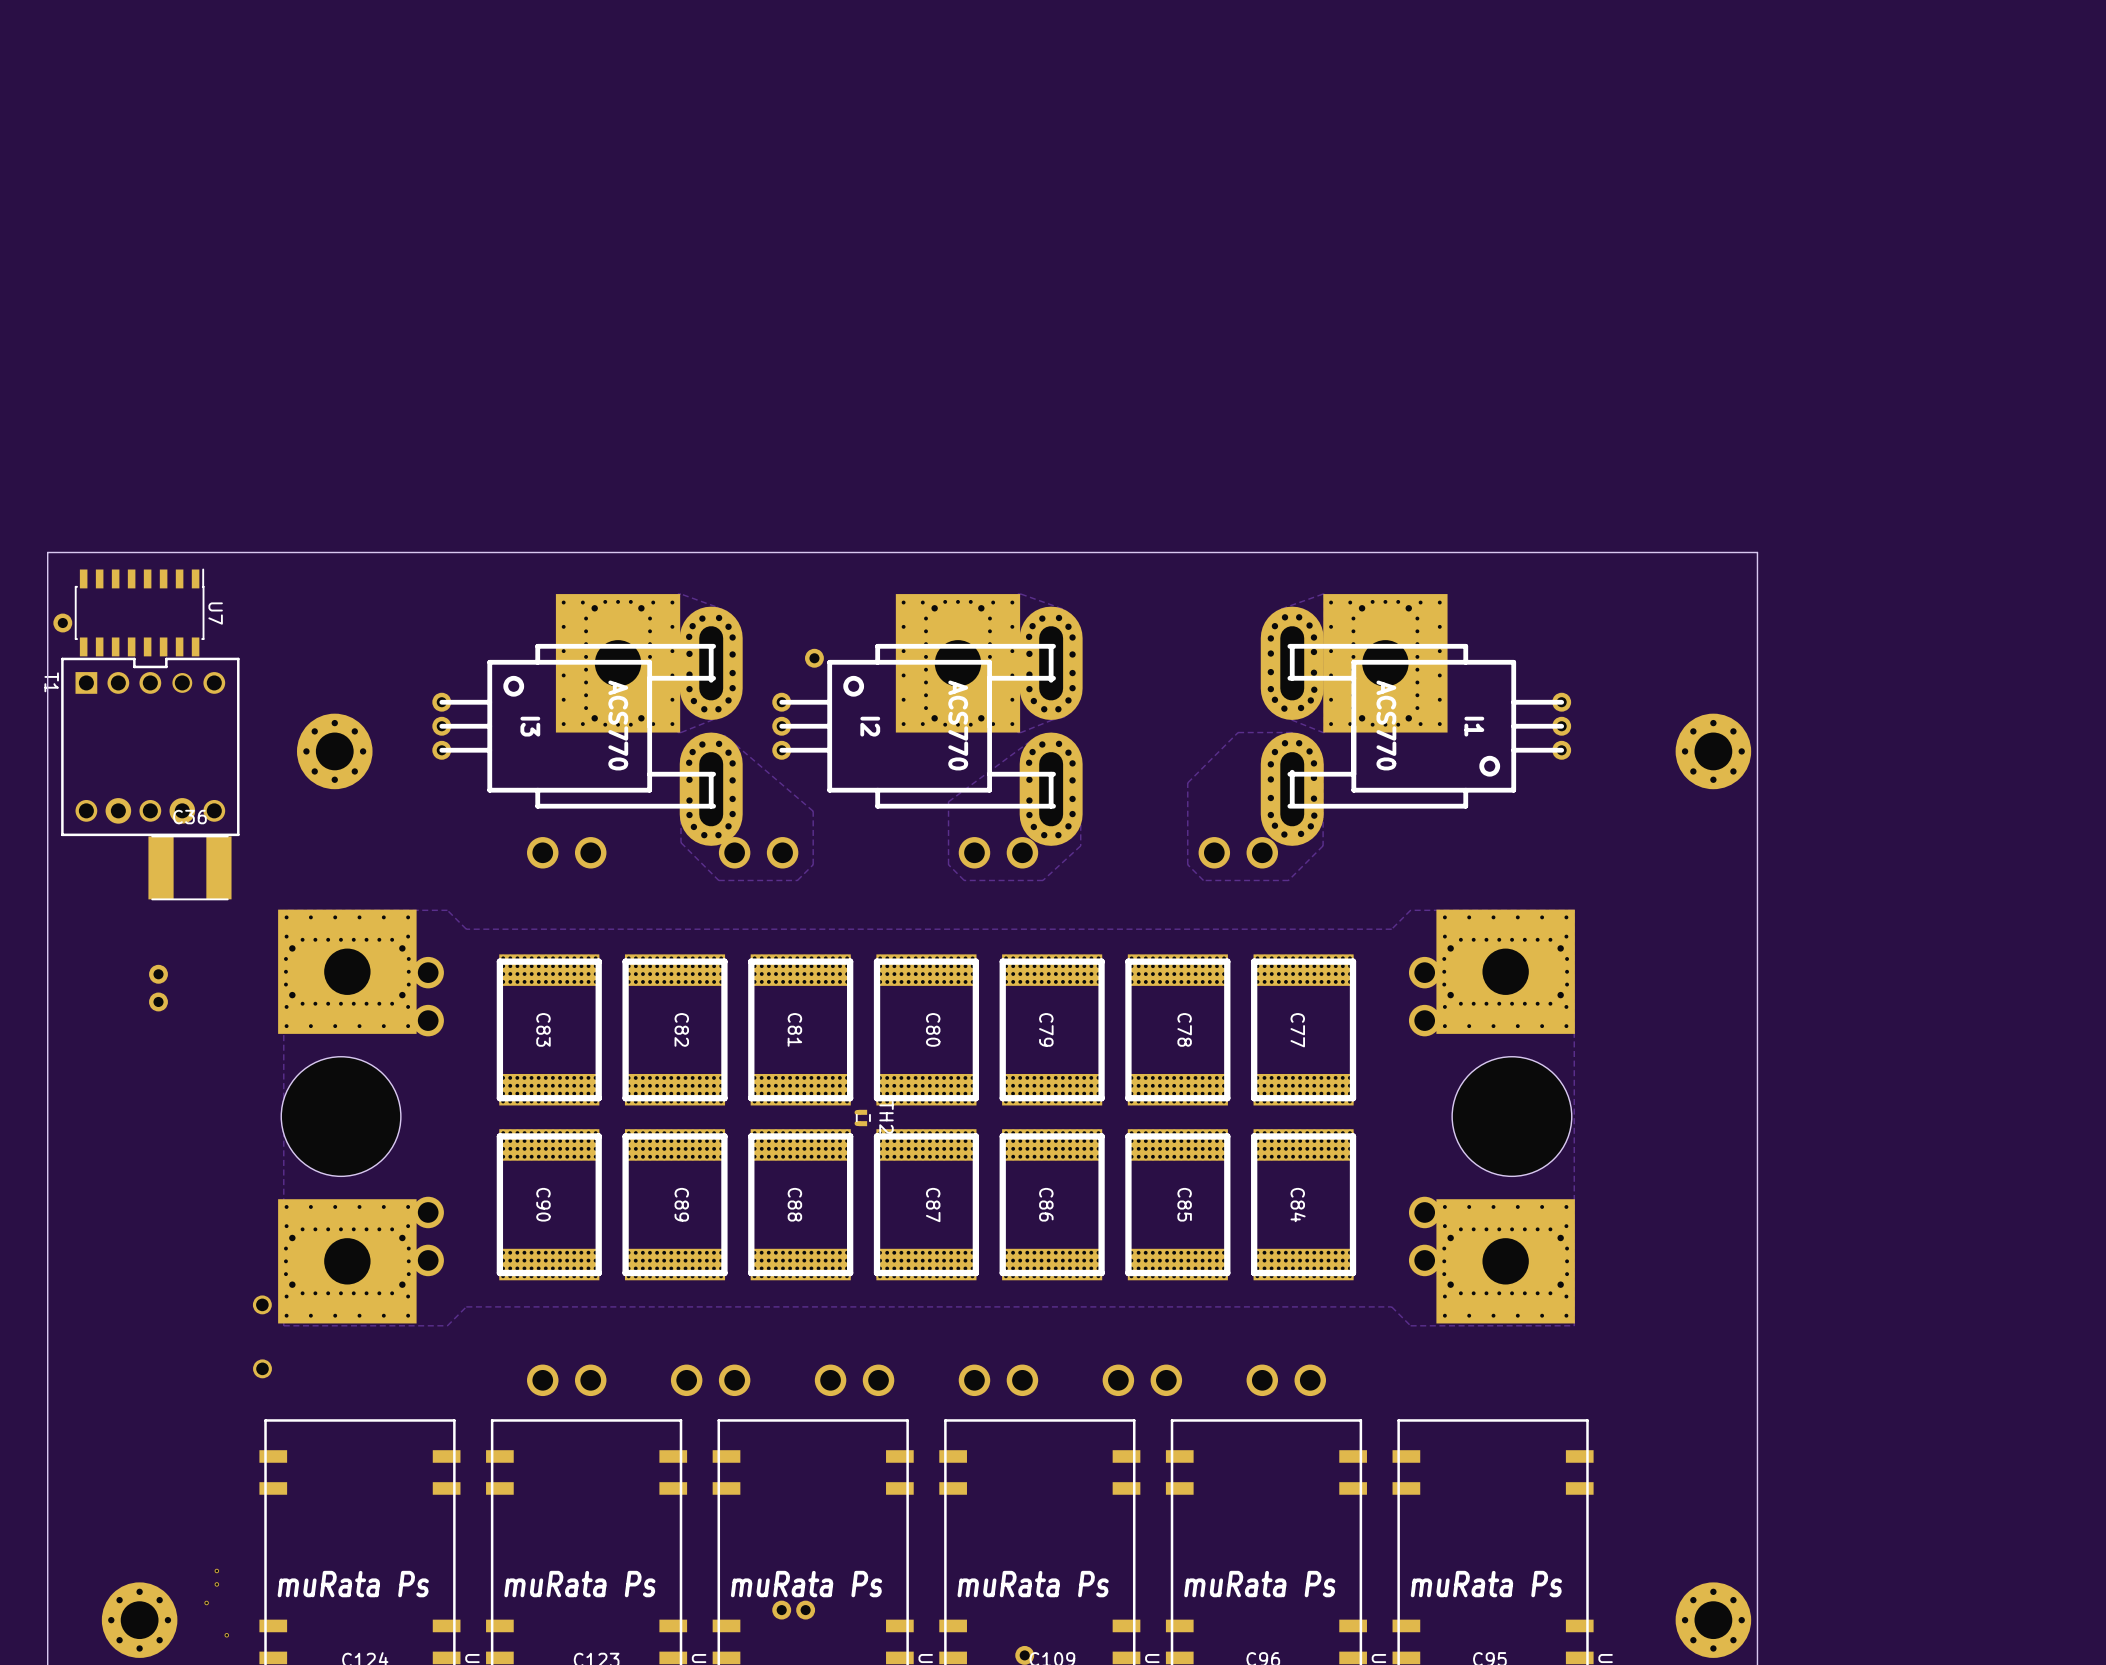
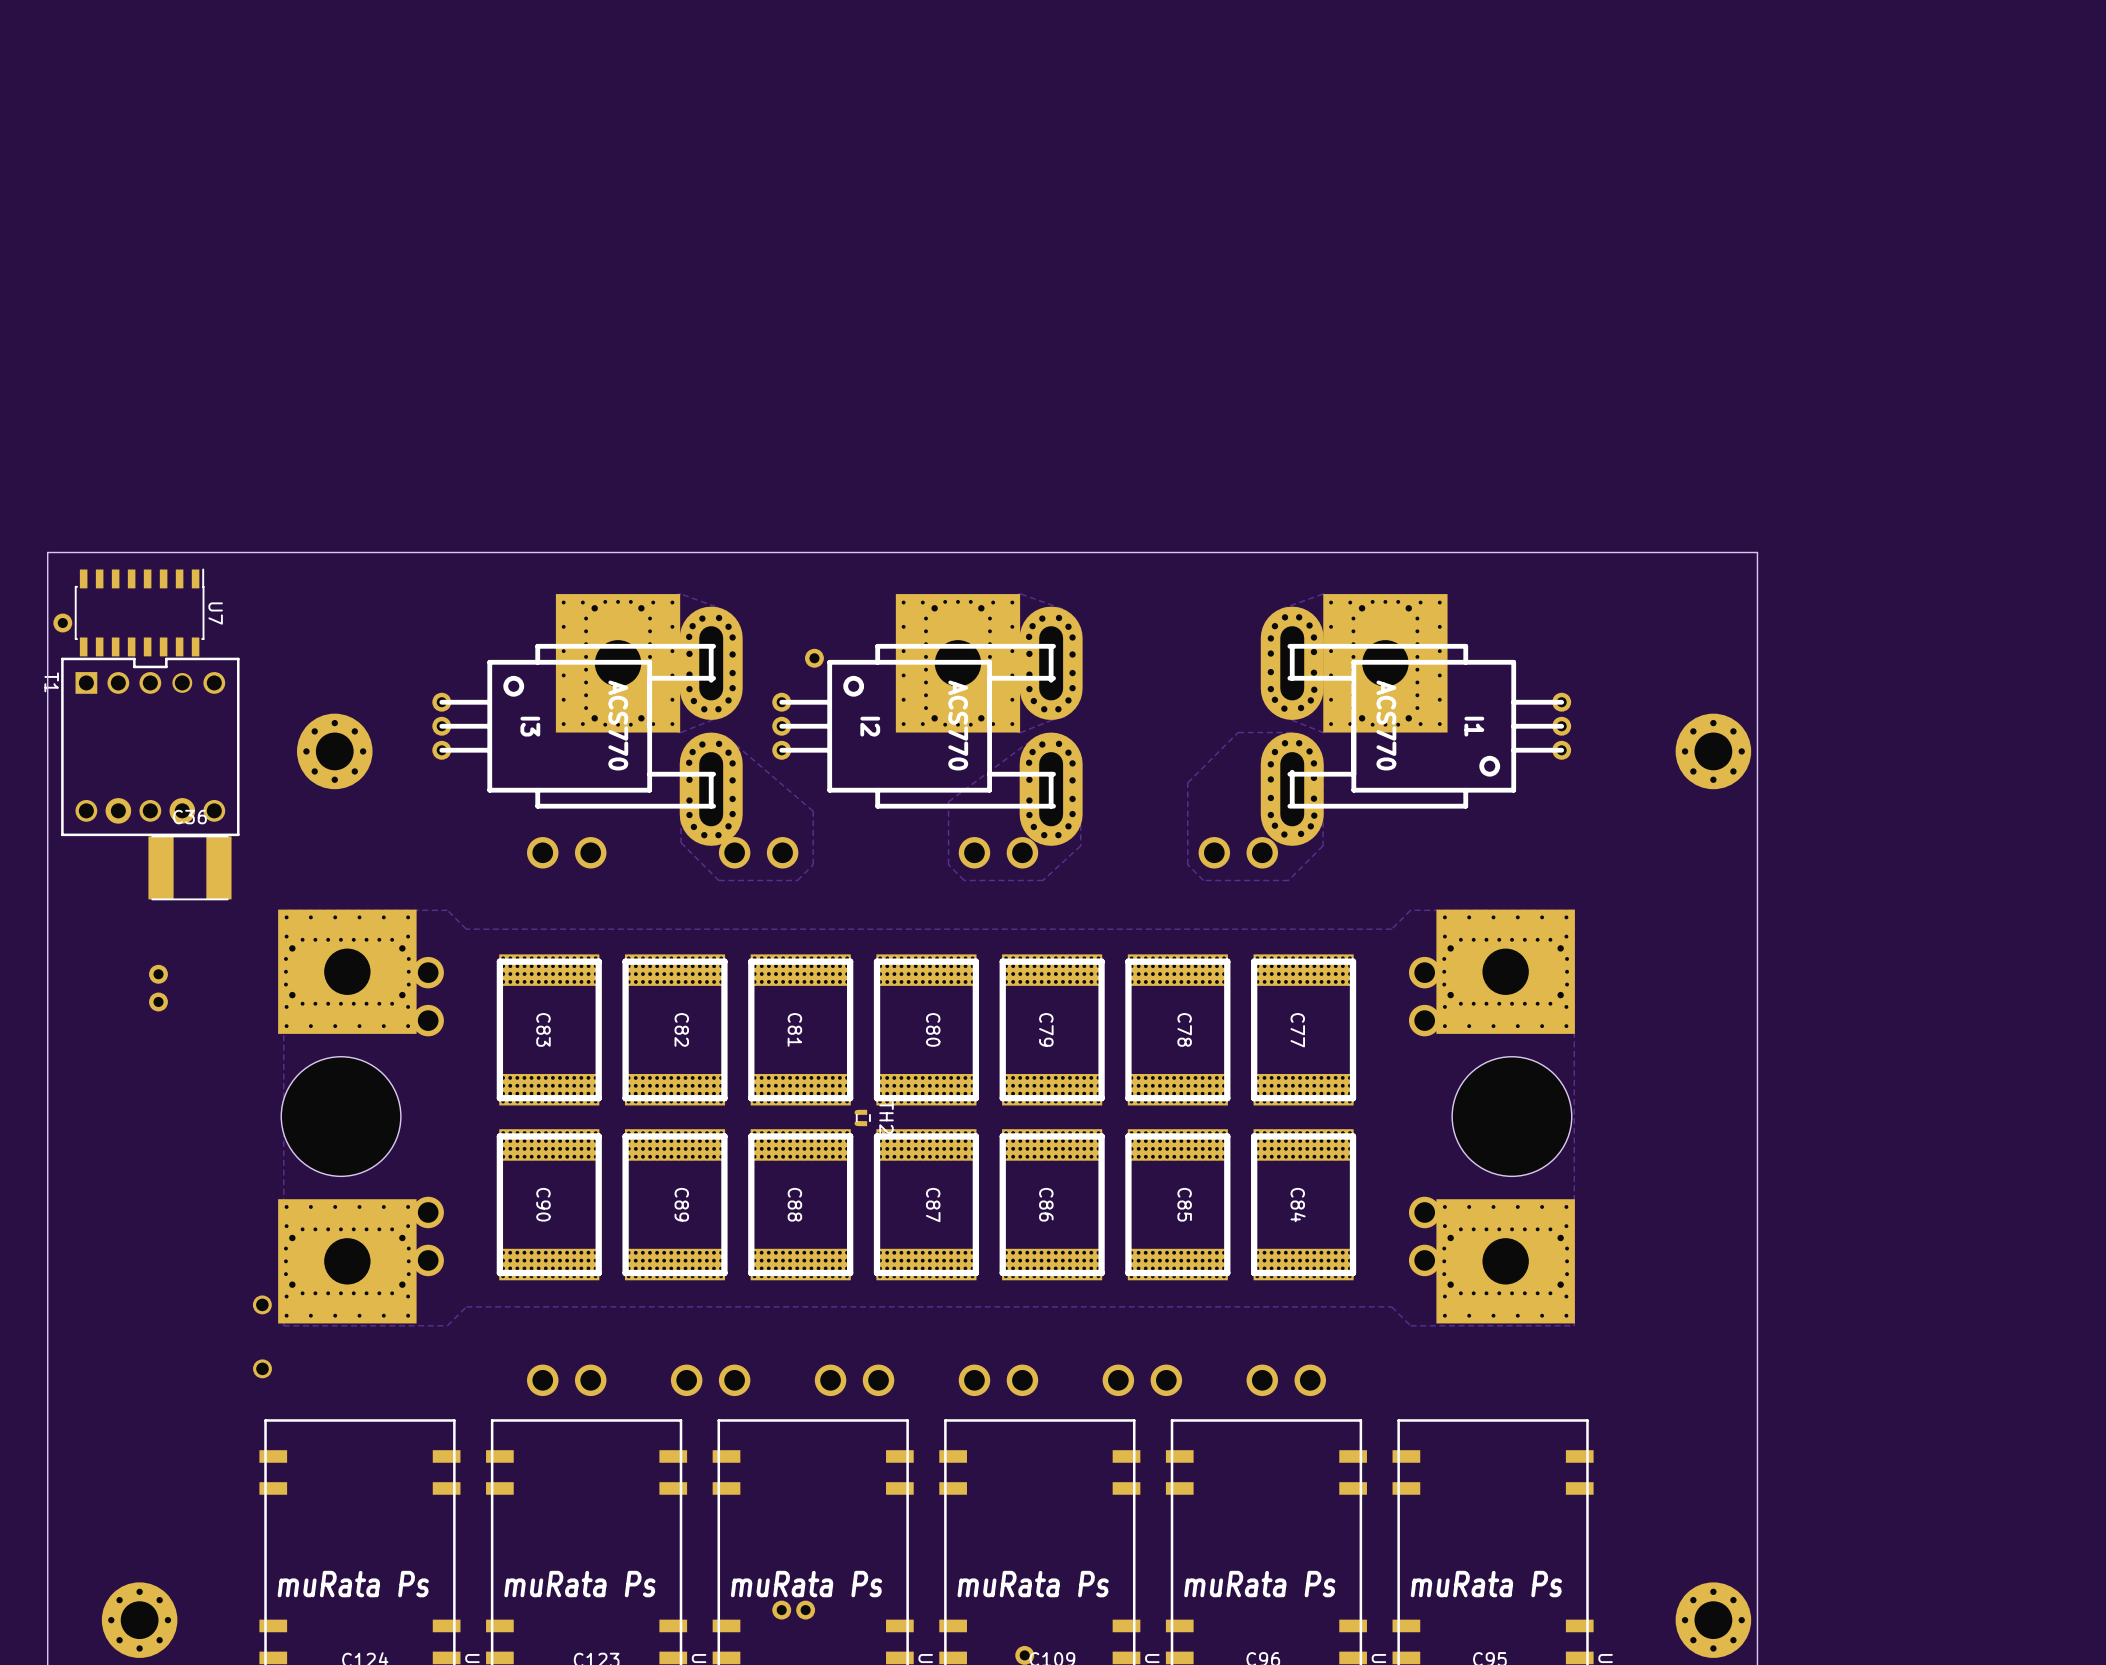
via: (216, 1571) -> none
via: (216, 1584) -> none
via: (206, 1602) -> none
via: (226, 1635) -> none

